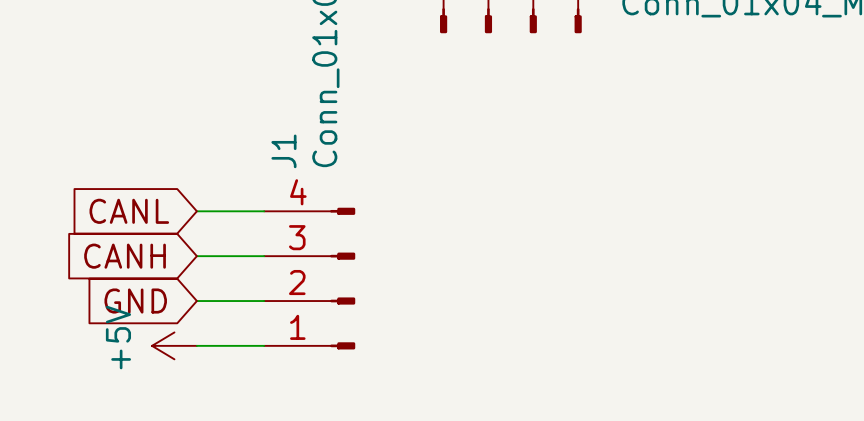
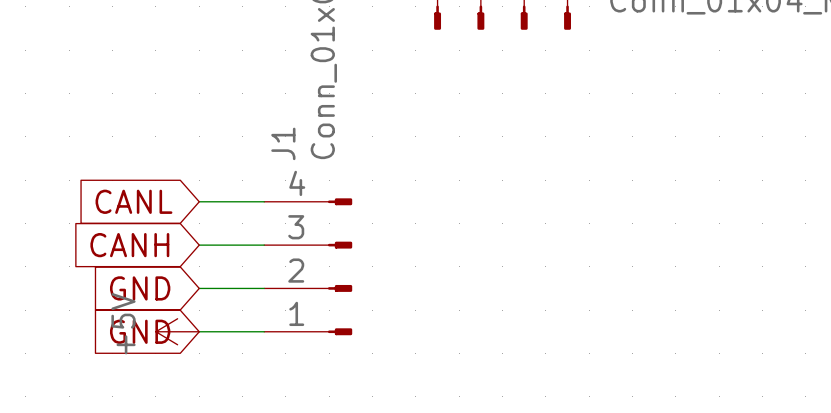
global label: none -> GND (140, 331)

